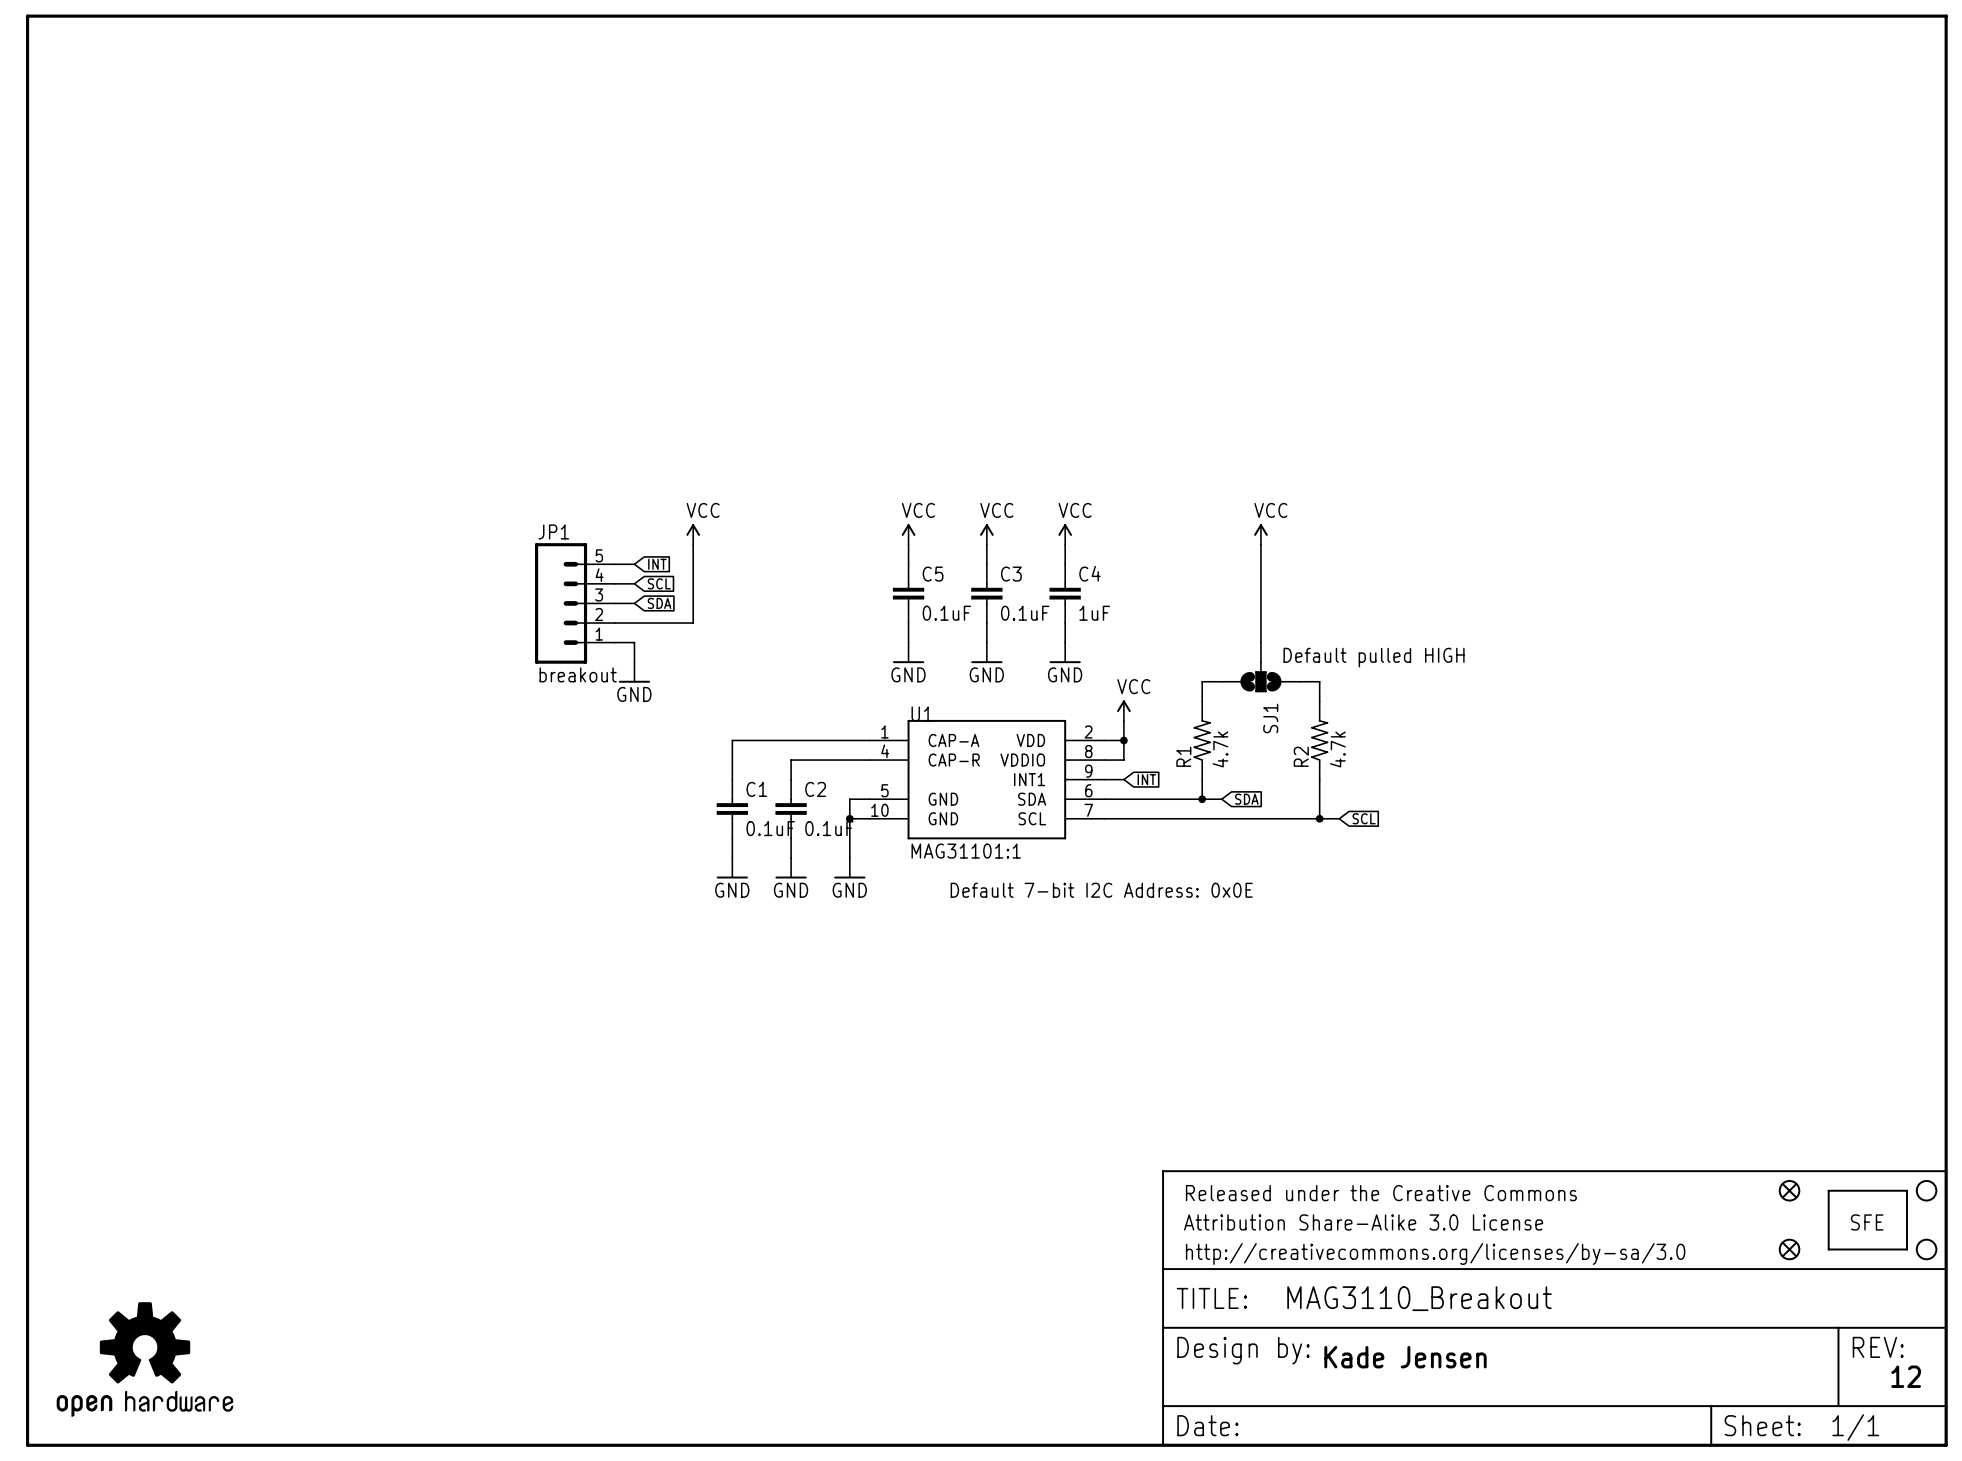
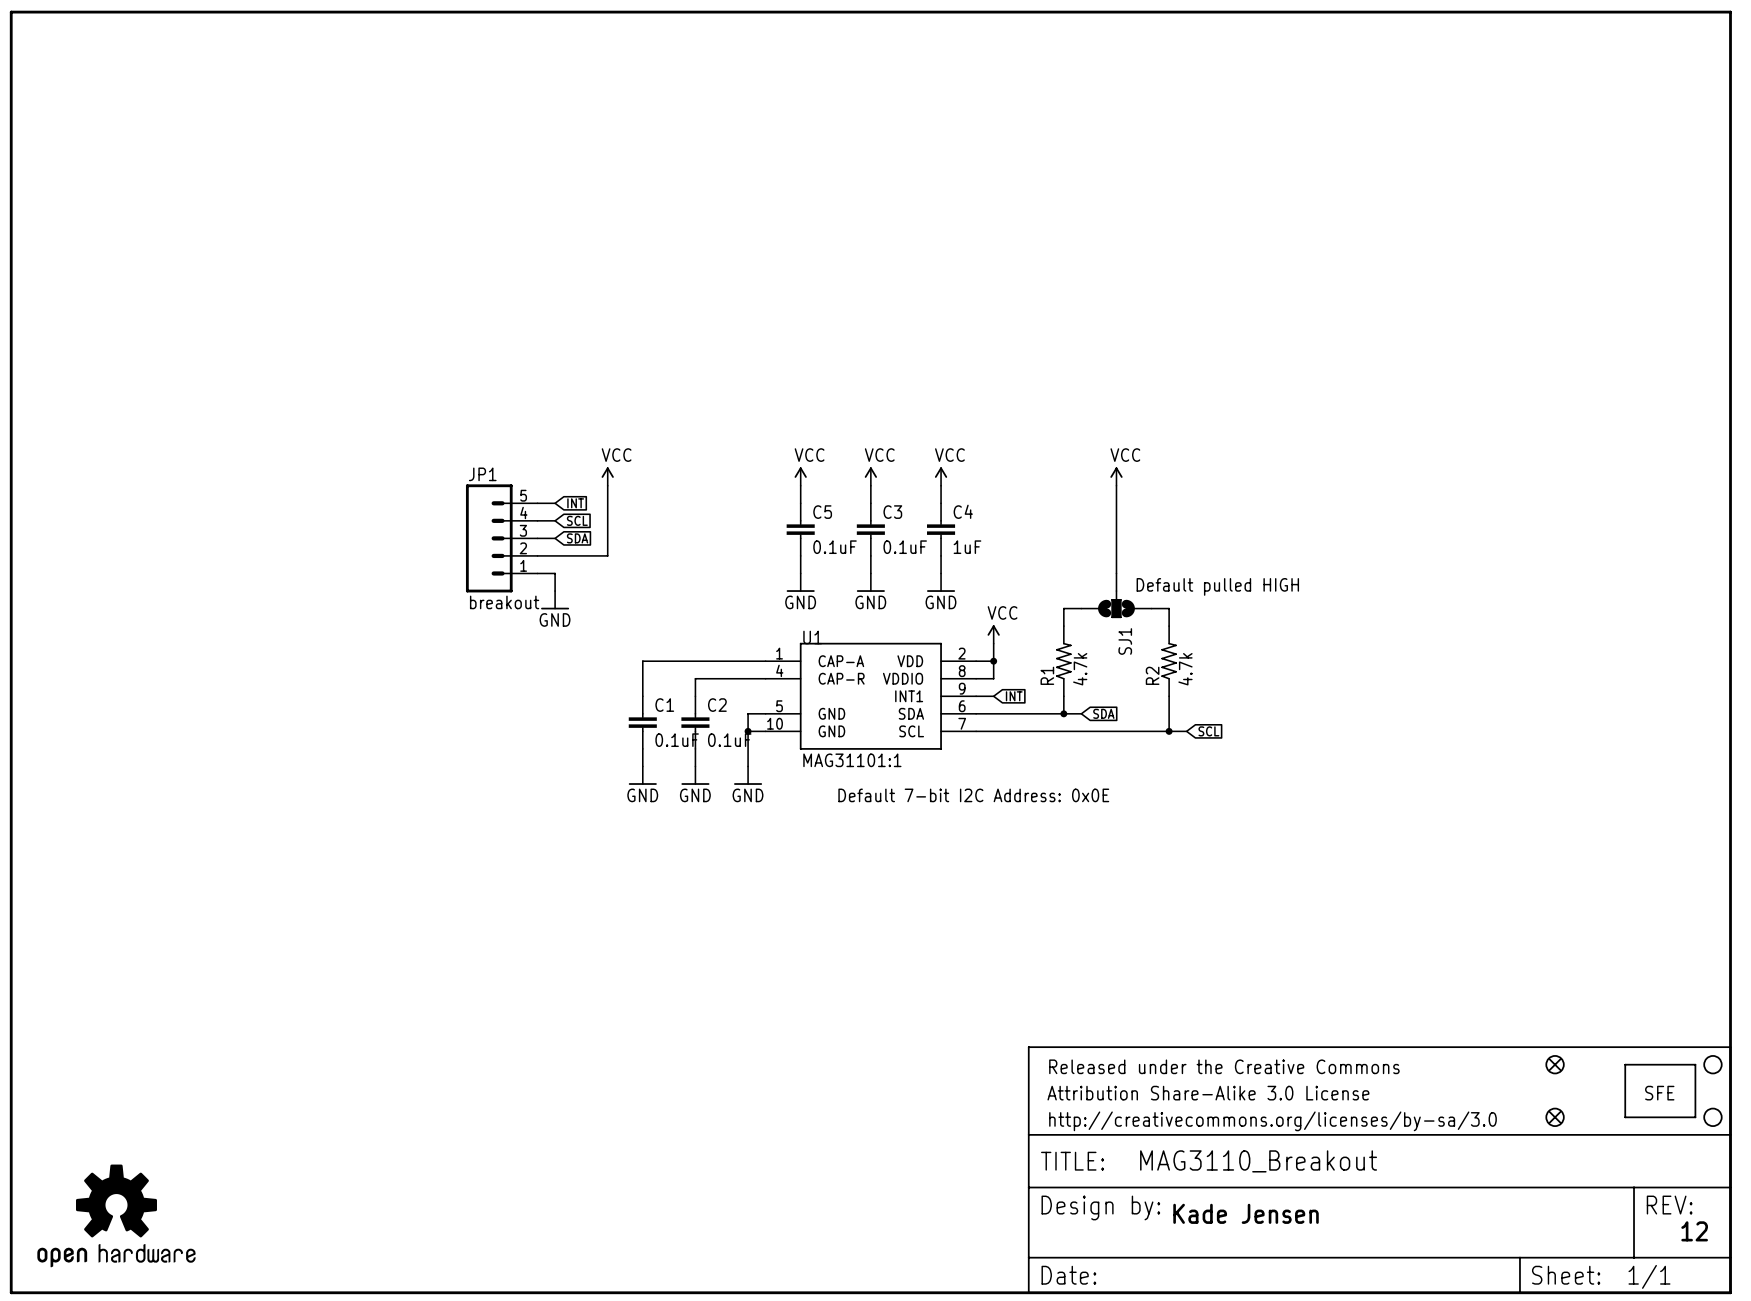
part: none -> (1555, 1064)
part: (1789, 1190) -> none
part: none -> (1555, 1117)
part: (1789, 1249) -> none

